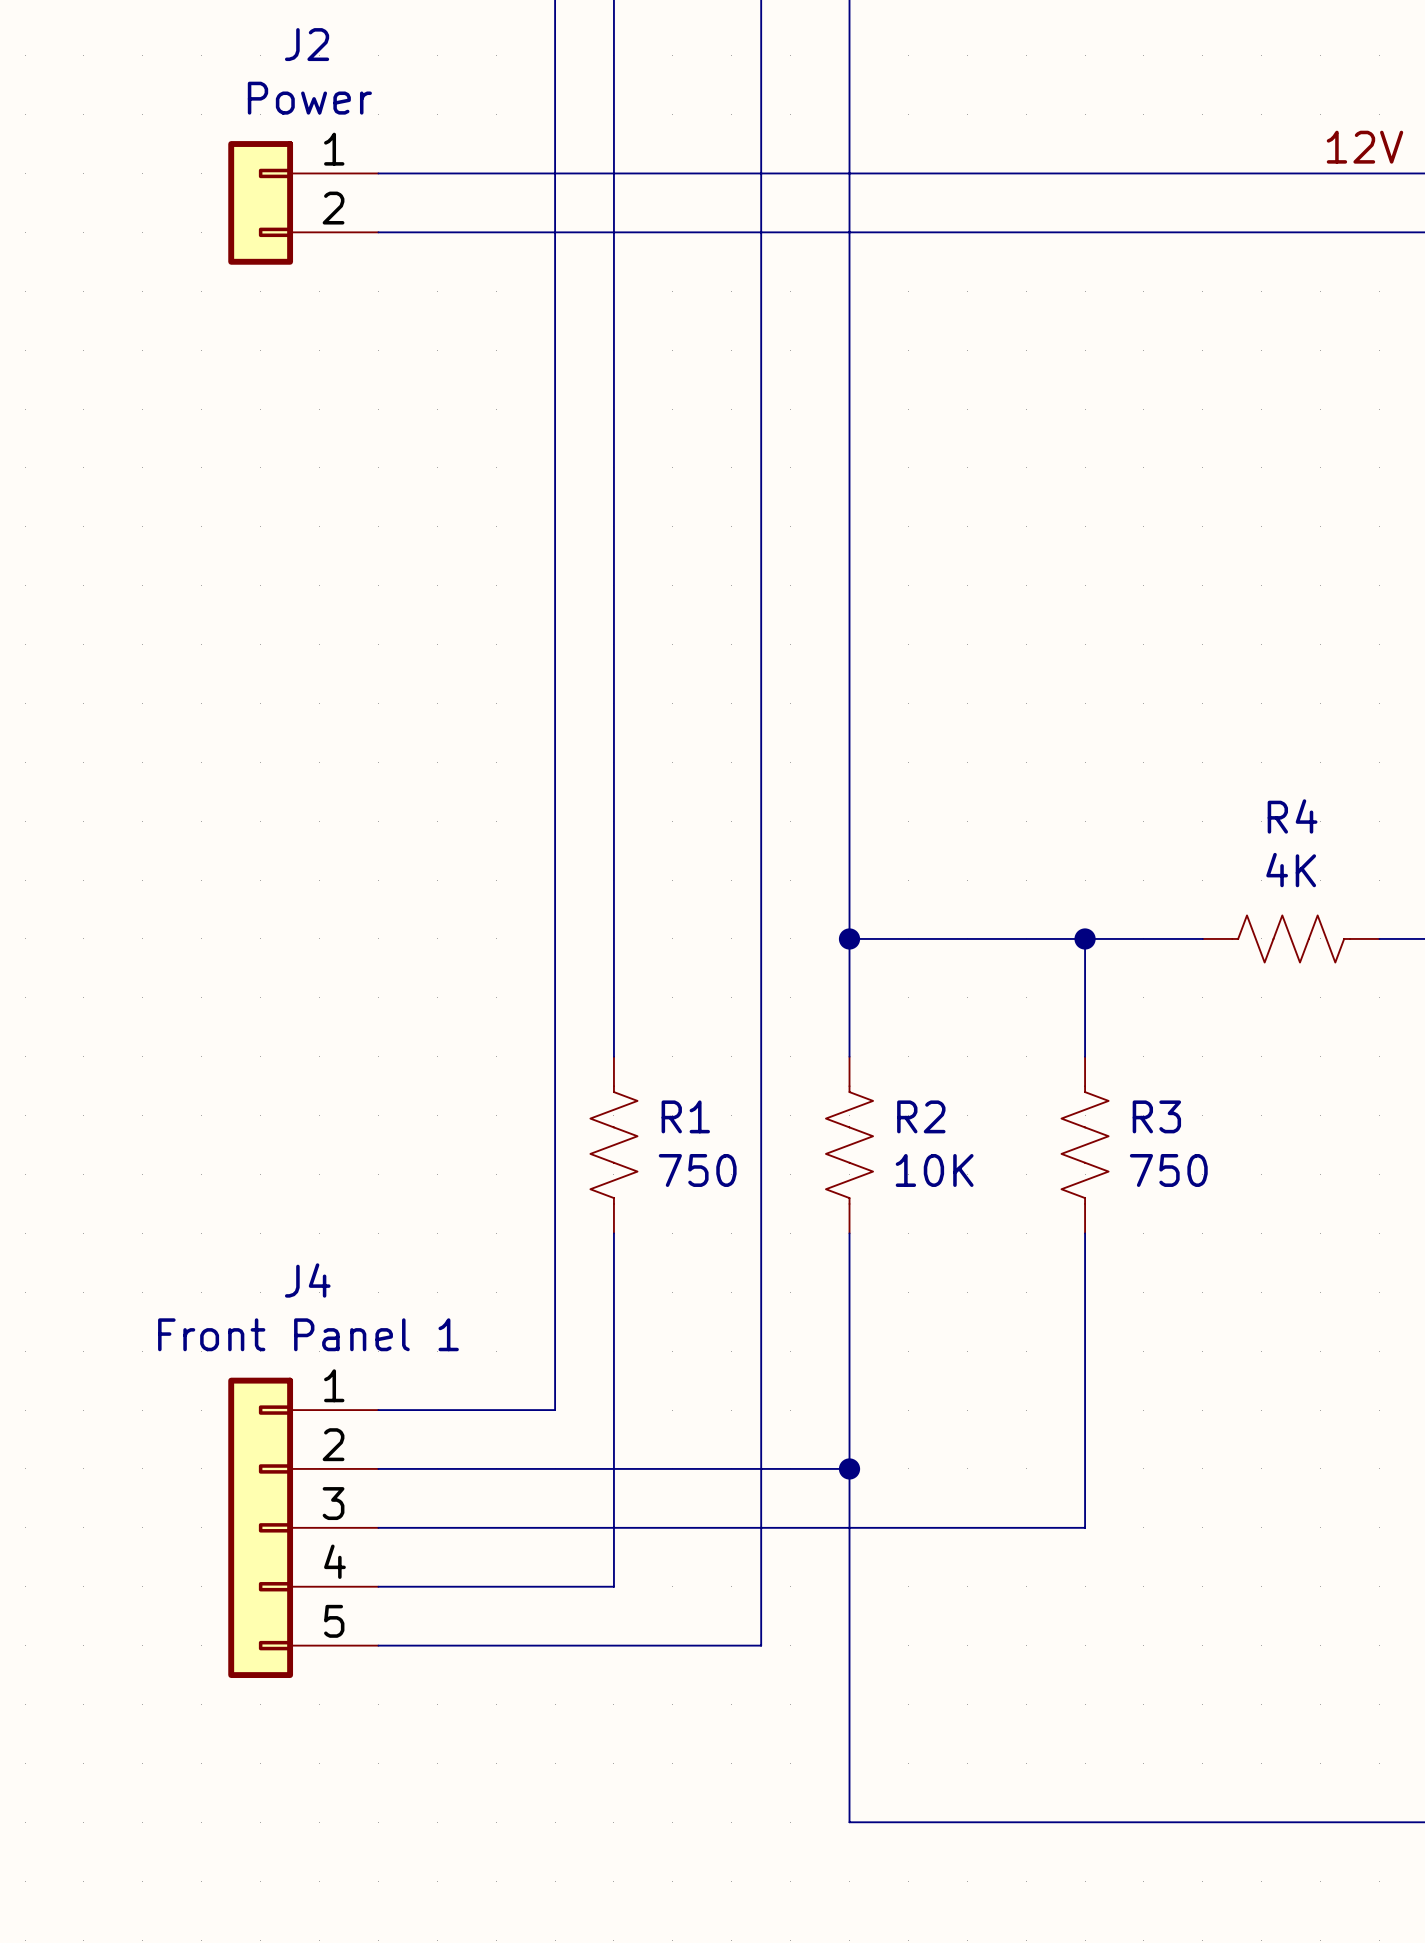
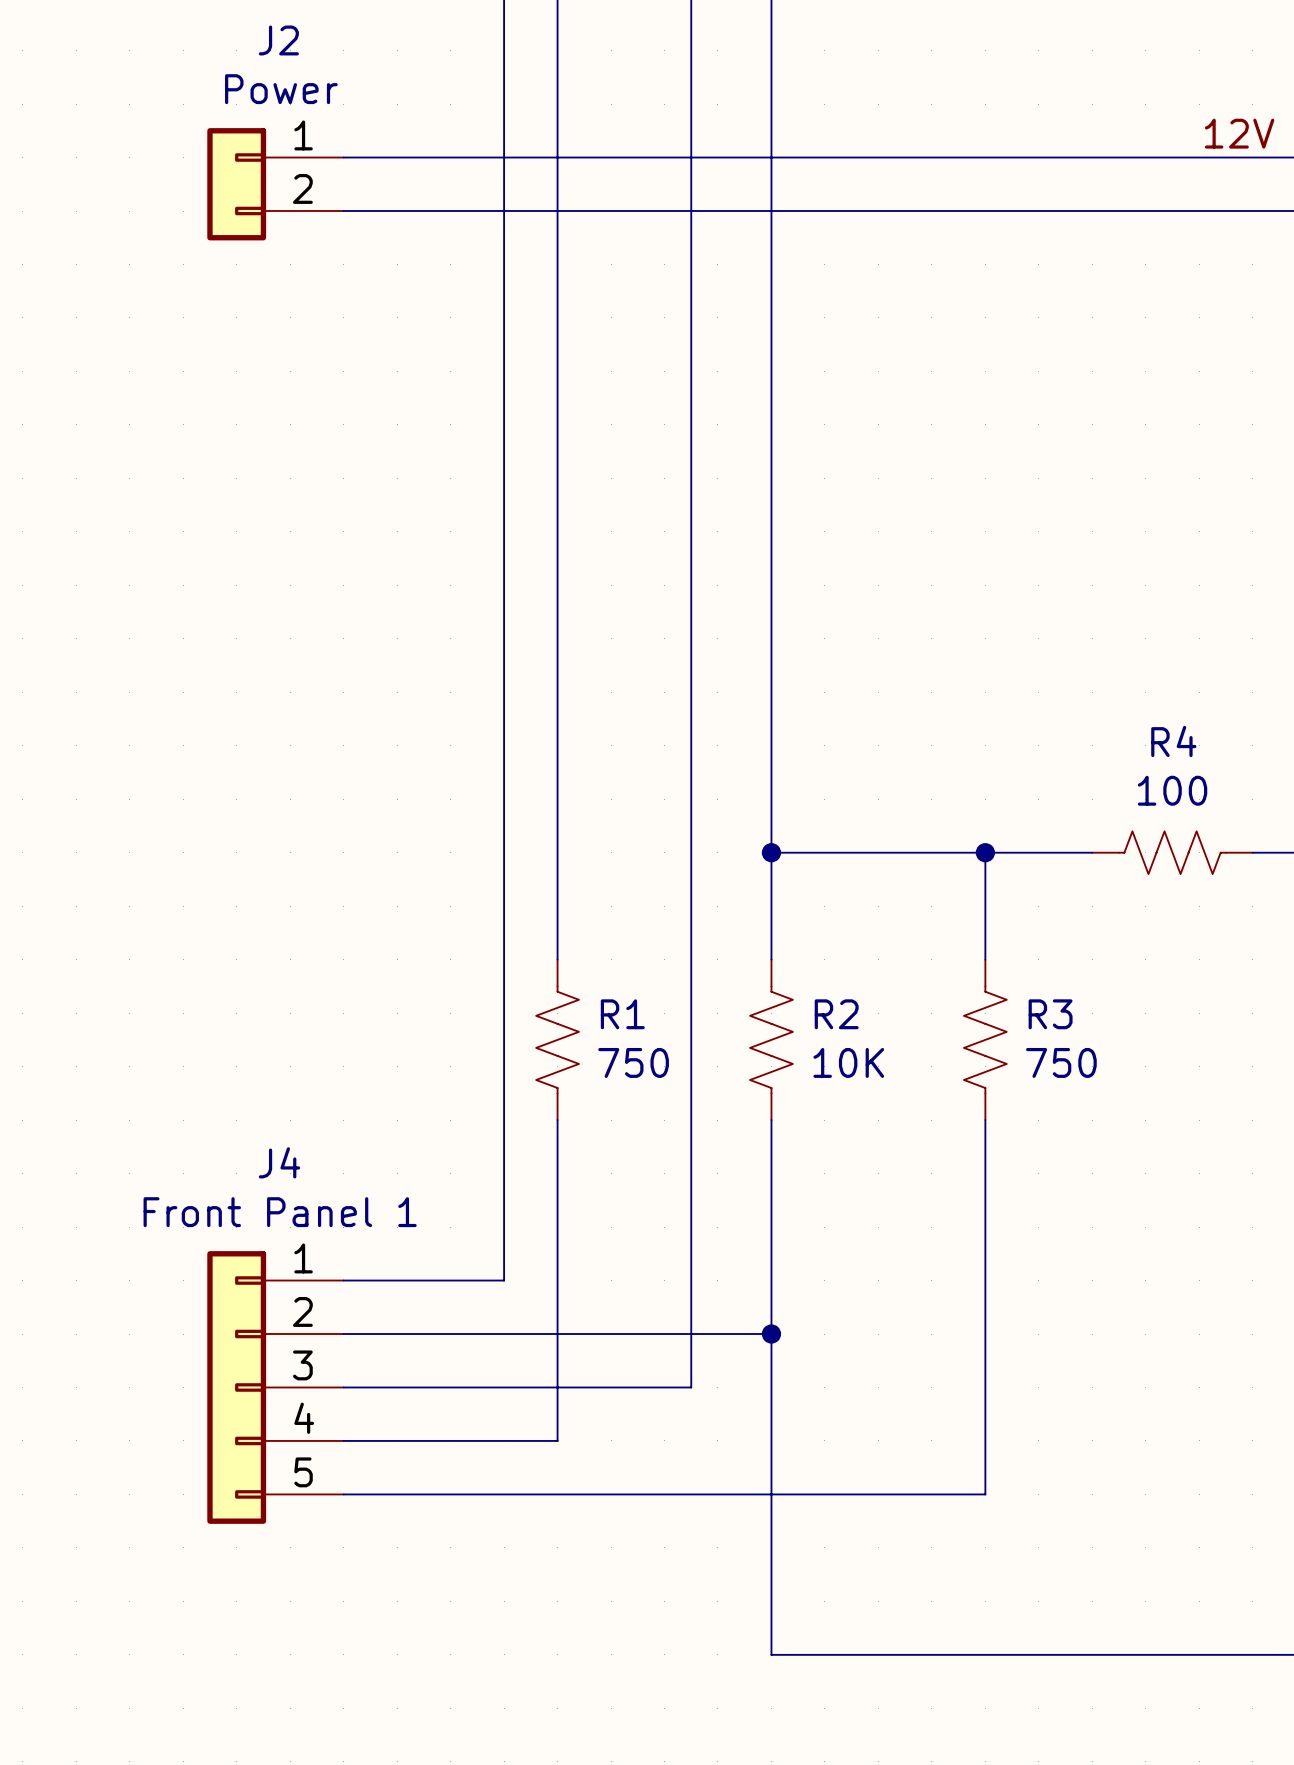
R4 value: 4K (1291, 870) -> 100 (1172, 790)
wire: (1085, 1527) (761, 1527) (761, 1645) -> (985, 1387) (985, 1494) (691, 1494)

